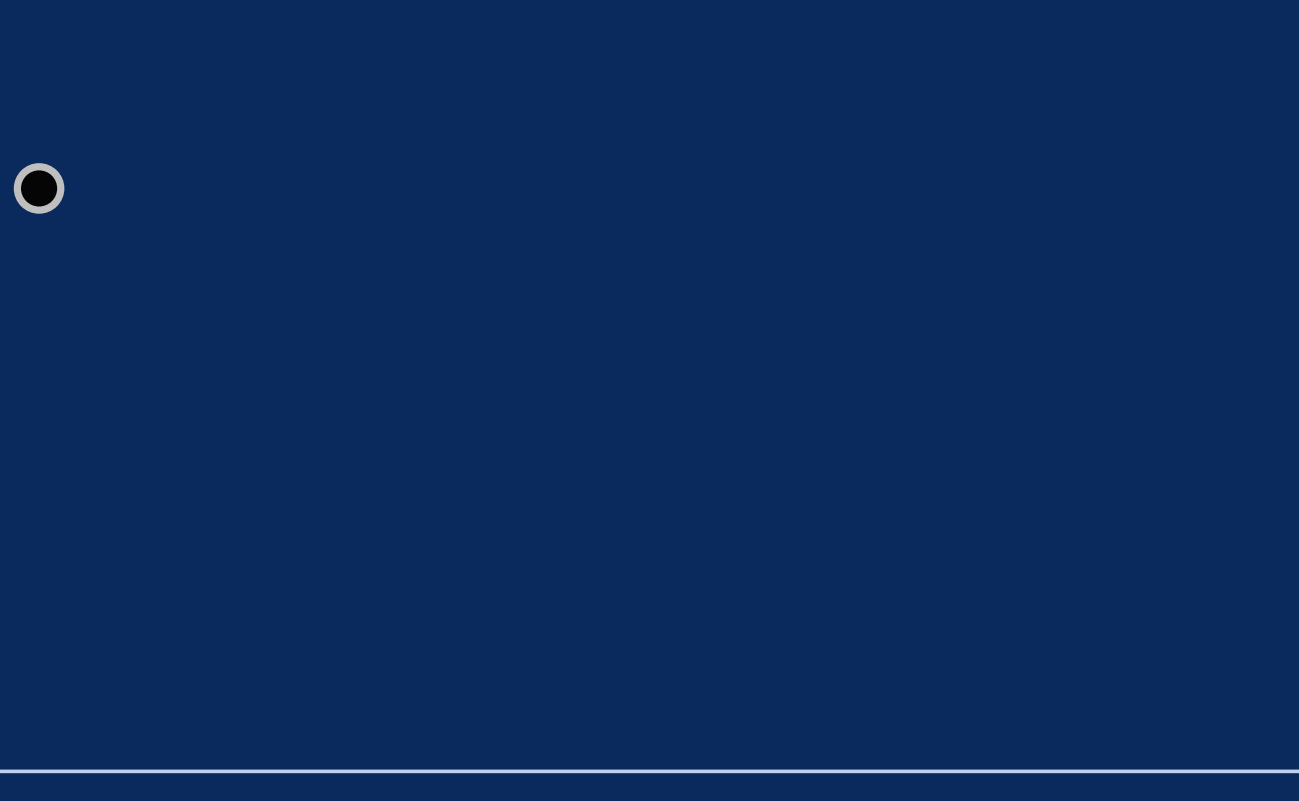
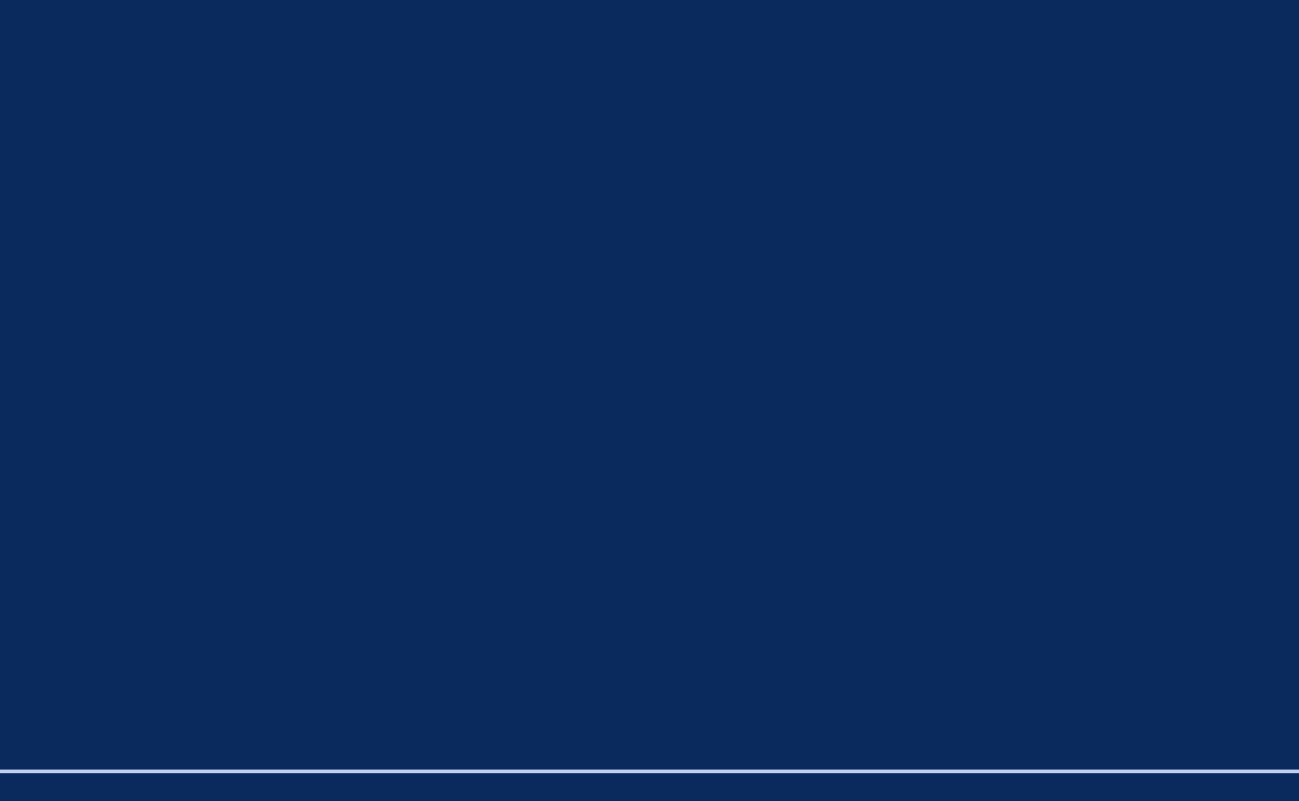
via: (39, 188) -> none

